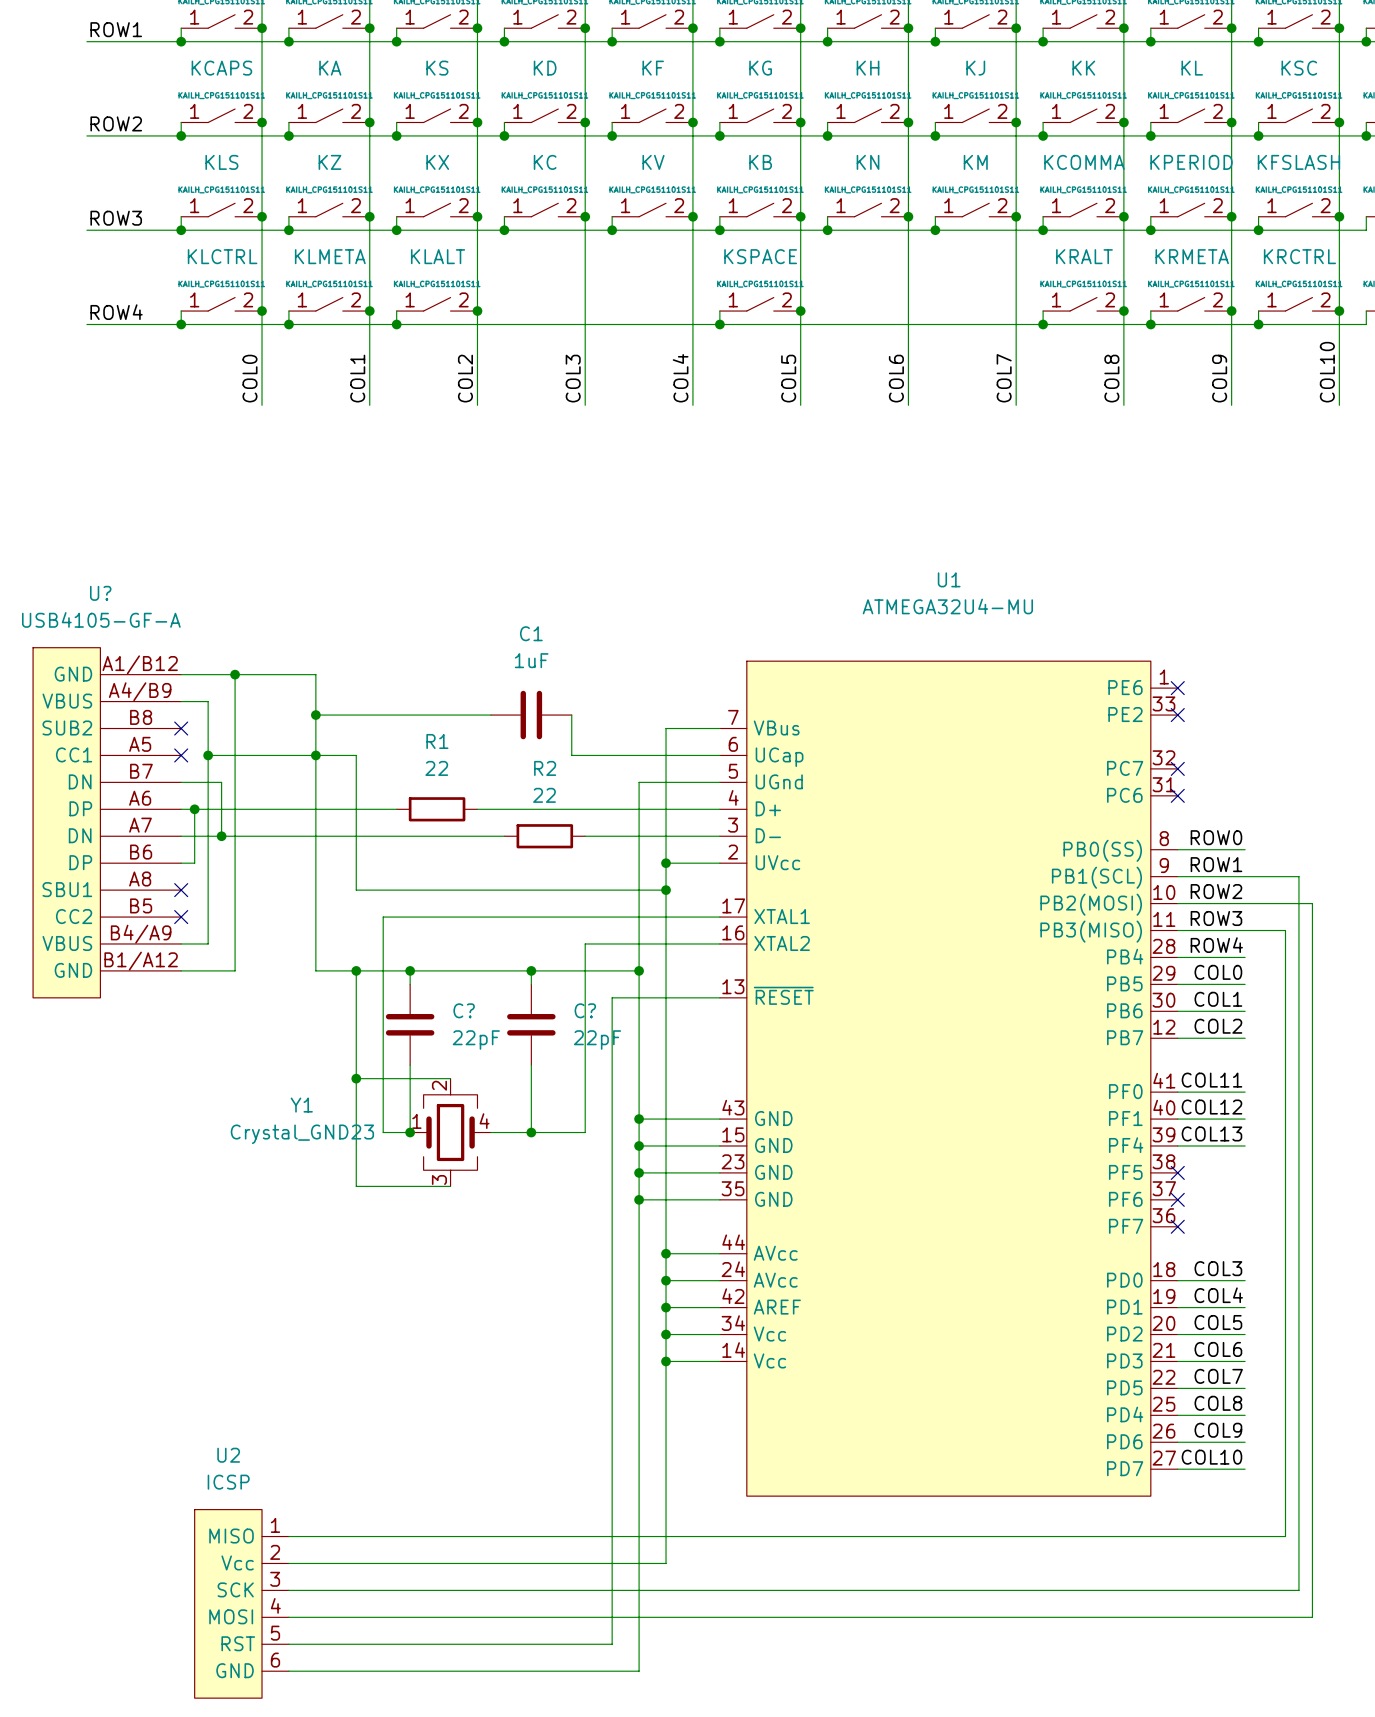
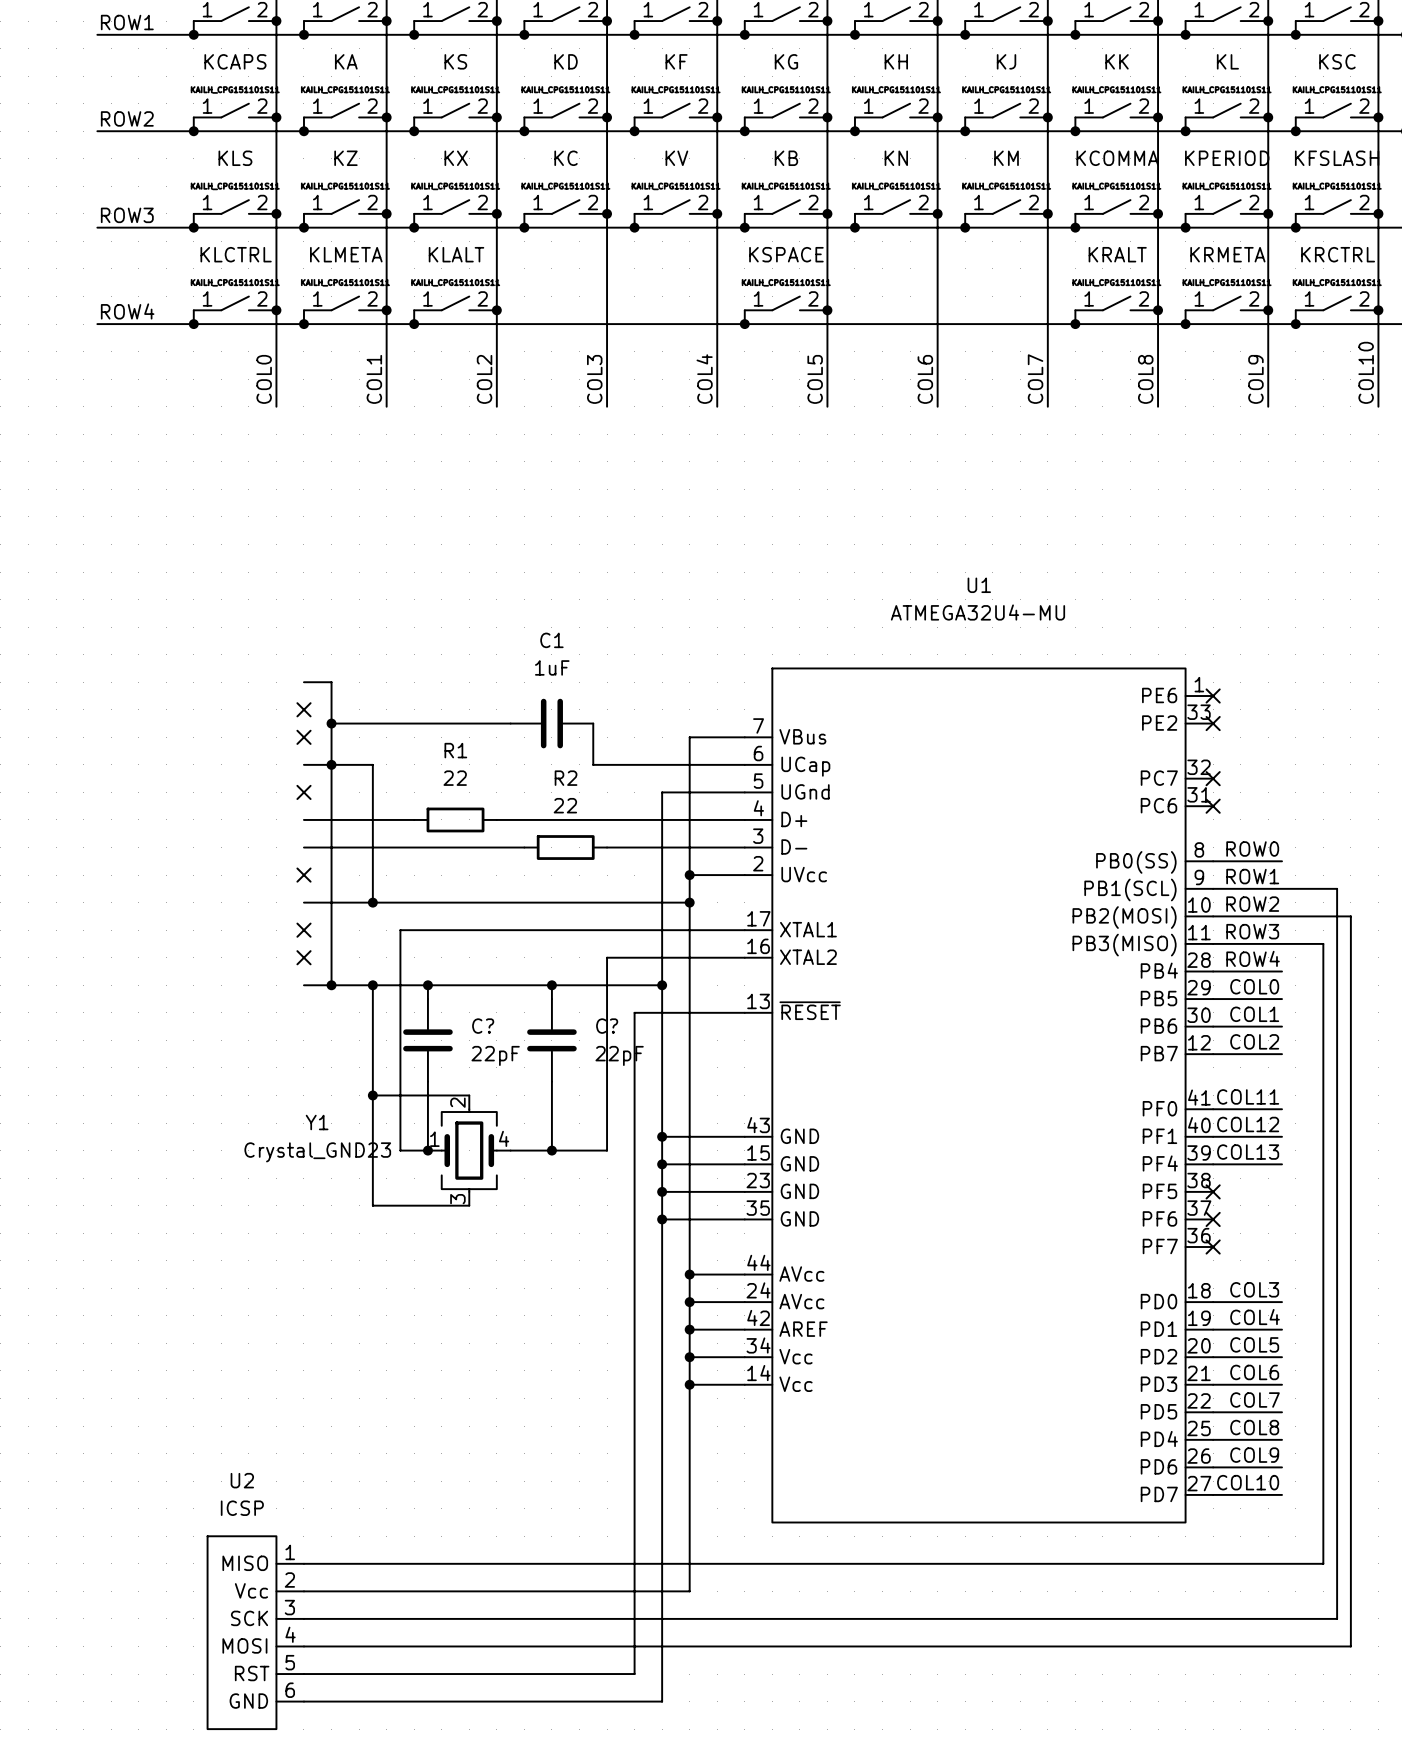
wire: (181, 674) (288, 674) -> none
wire: (235, 674) (235, 970) (181, 970) -> none
junction: (235, 674) -> none
wire: (181, 701) (208, 701) (208, 943) (181, 943) -> none
no-connect mark: none -> (303, 709)
no-connect mark: (181, 728) -> none
no-connect mark: none -> (303, 737)
no-connect mark: (181, 755) -> none
wire: (208, 755) (288, 755) -> none
junction: (208, 755) -> none
wire: (181, 782) (221, 782) (221, 836) -> none
no-connect mark: none -> (303, 792)
wire: (181, 809) (288, 809) -> none
wire: (194, 809) (194, 863) (181, 863) -> none
junction: (194, 809) -> none
U?: USB4105-GF-A (107, 822) -> none
wire: (181, 836) (288, 836) -> none
junction: (221, 836) -> none
no-connect mark: none -> (303, 875)
no-connect mark: (181, 890) -> none
wire: none -> (303, 902) (372, 902)
junction: none -> (372, 902)
no-connect mark: (181, 917) -> none
no-connect mark: none -> (303, 930)
no-connect mark: none -> (303, 957)
wire: none -> (303, 985) (331, 985)
junction: none -> (331, 985)

